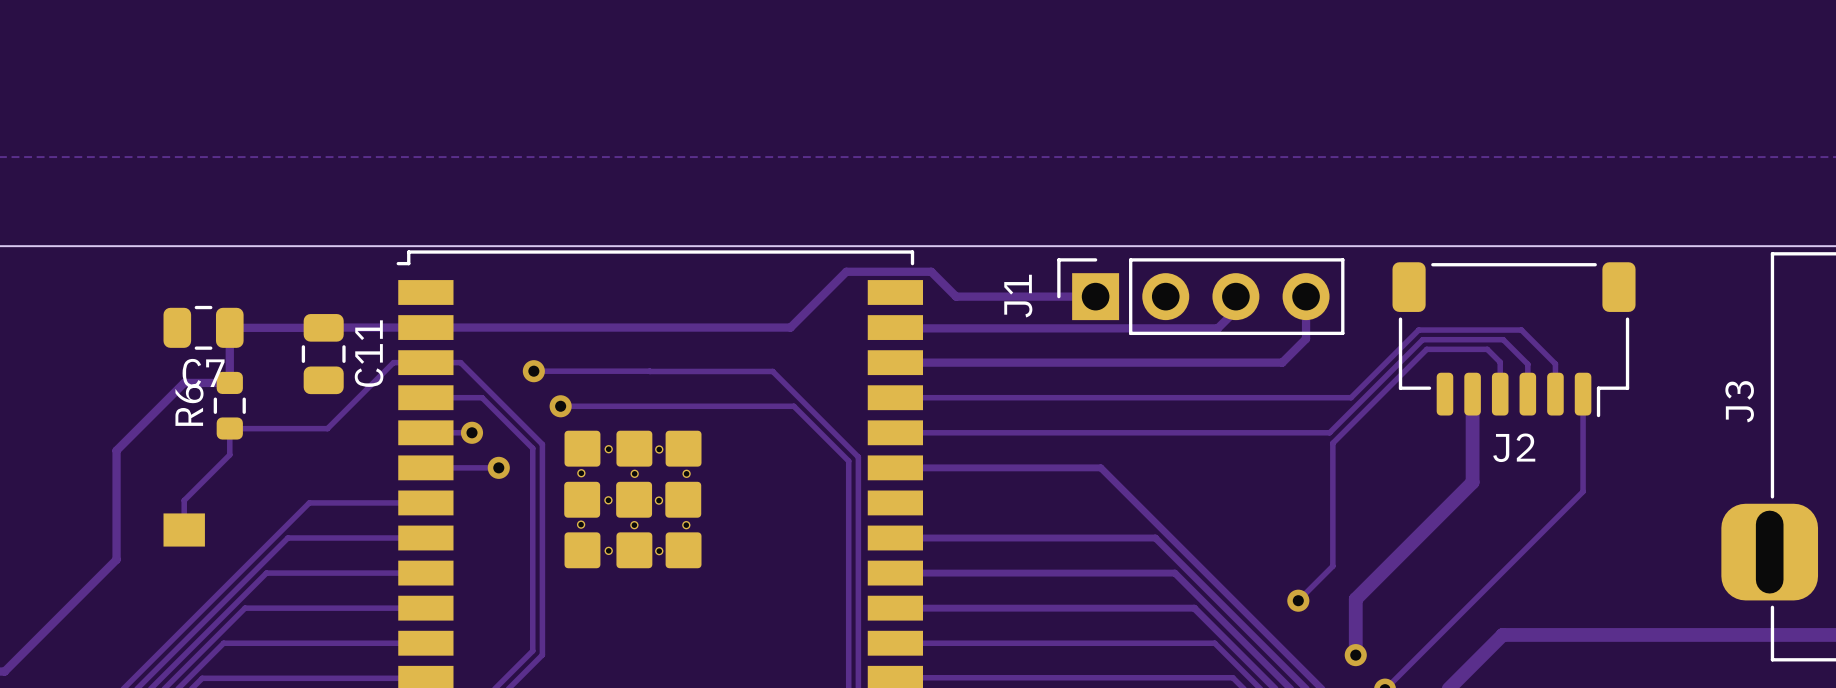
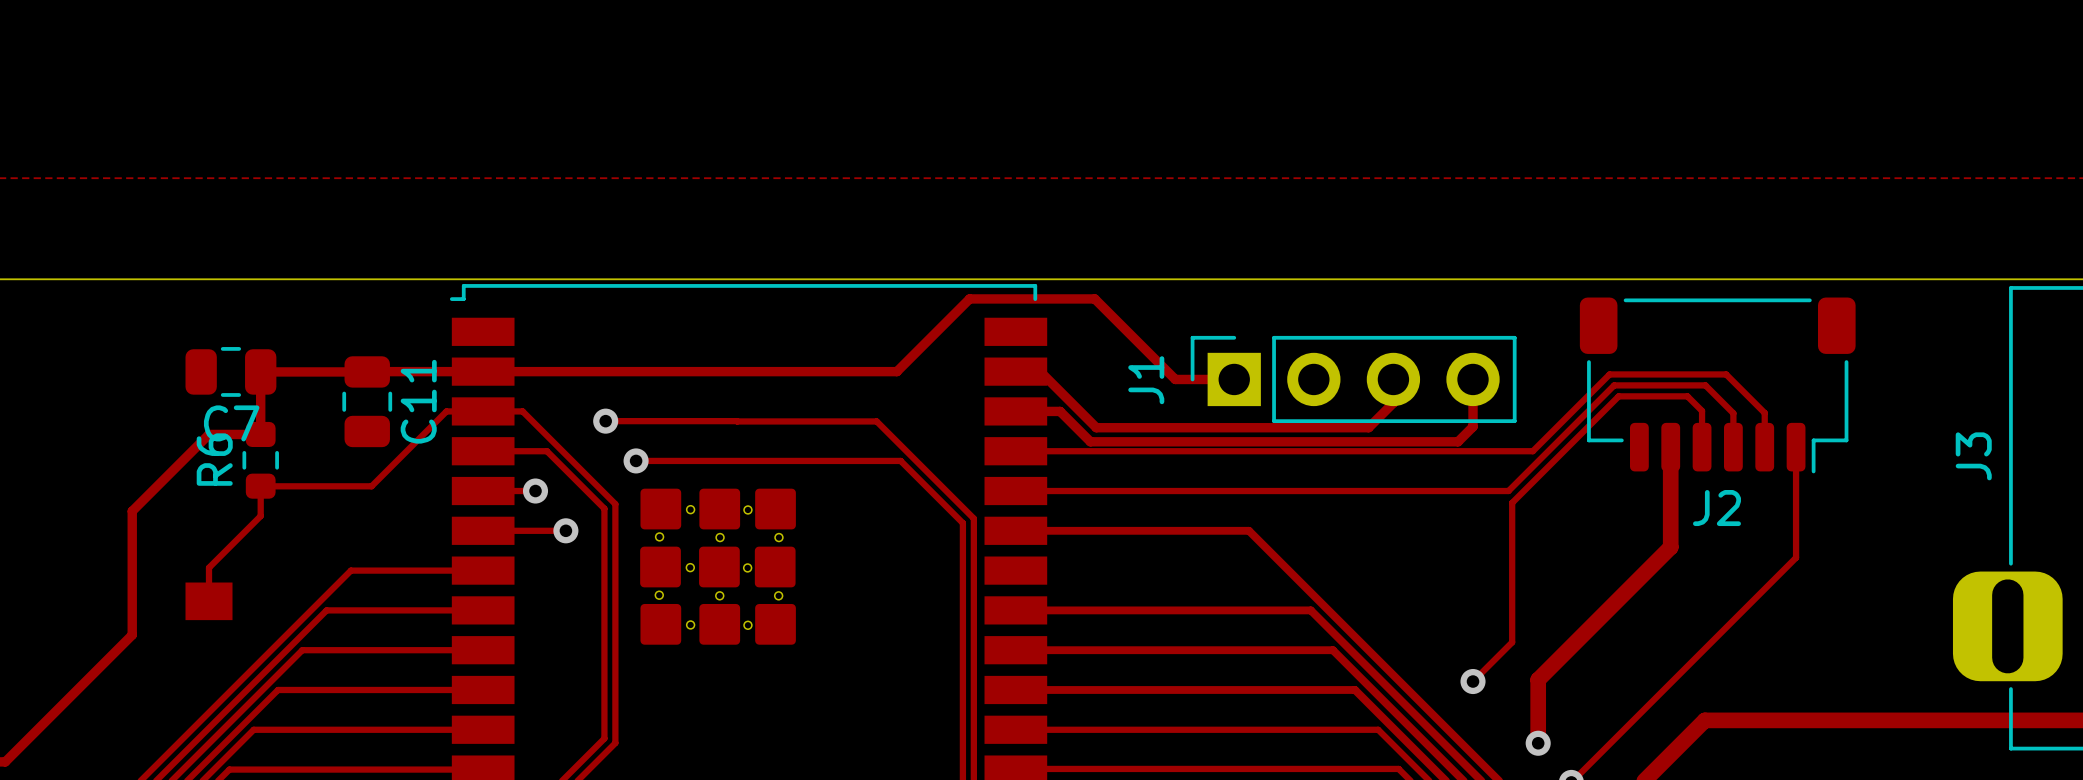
track: (846, 271) (931, 271) (956, 296) (1095, 296) -> (960, 308) (969, 298) (1094, 298) (1175, 379) (1234, 379)
J1 position: (1200, 296) -> (1353, 379)
track: (1235, 296) (1235, 310) (1217, 328) (895, 327) -> (1393, 379) (1393, 402) (1368, 427) (1096, 427) (1040, 371) (1015, 371)
track: (1306, 296) (1306, 338) (1282, 362) (934, 362) -> (1473, 379) (1473, 426) (1457, 441) (1090, 441) (1060, 411)

